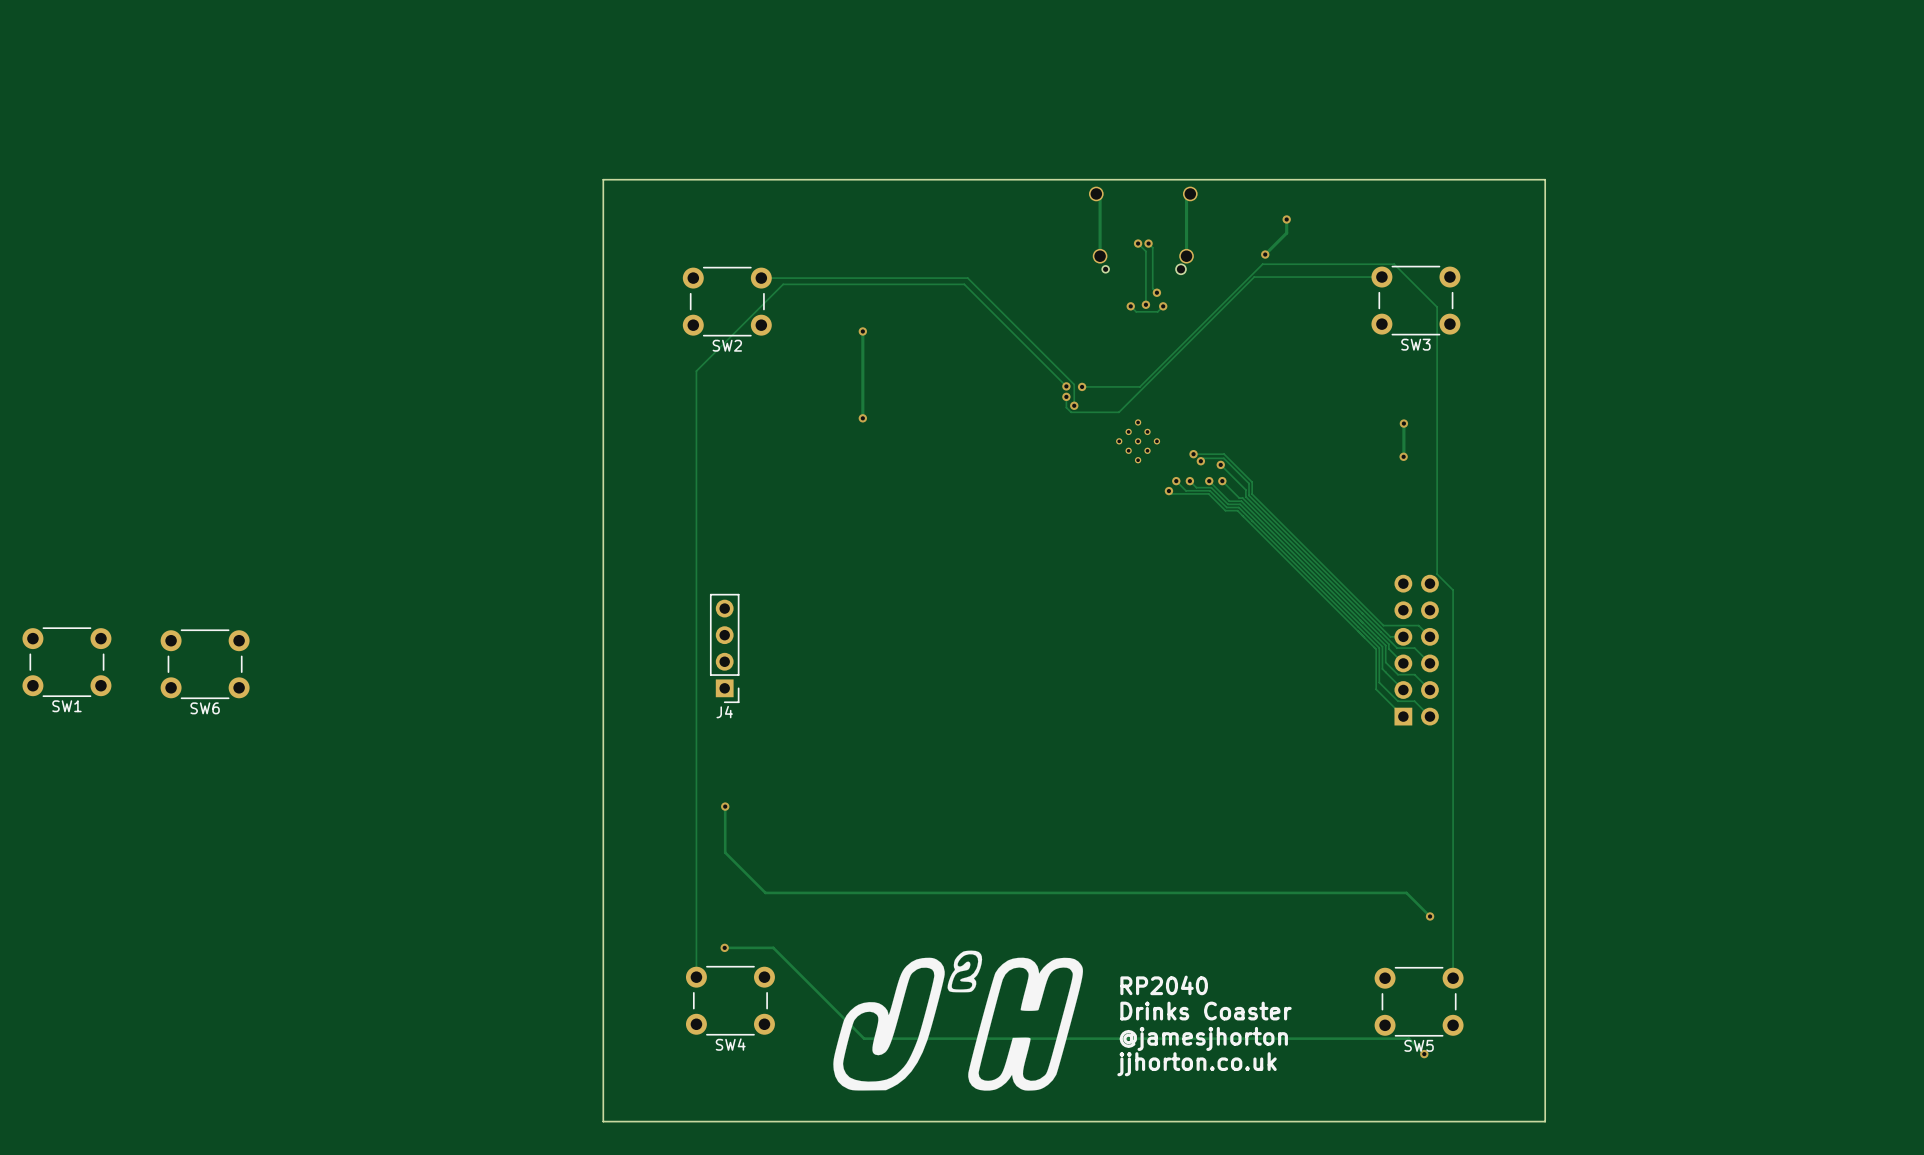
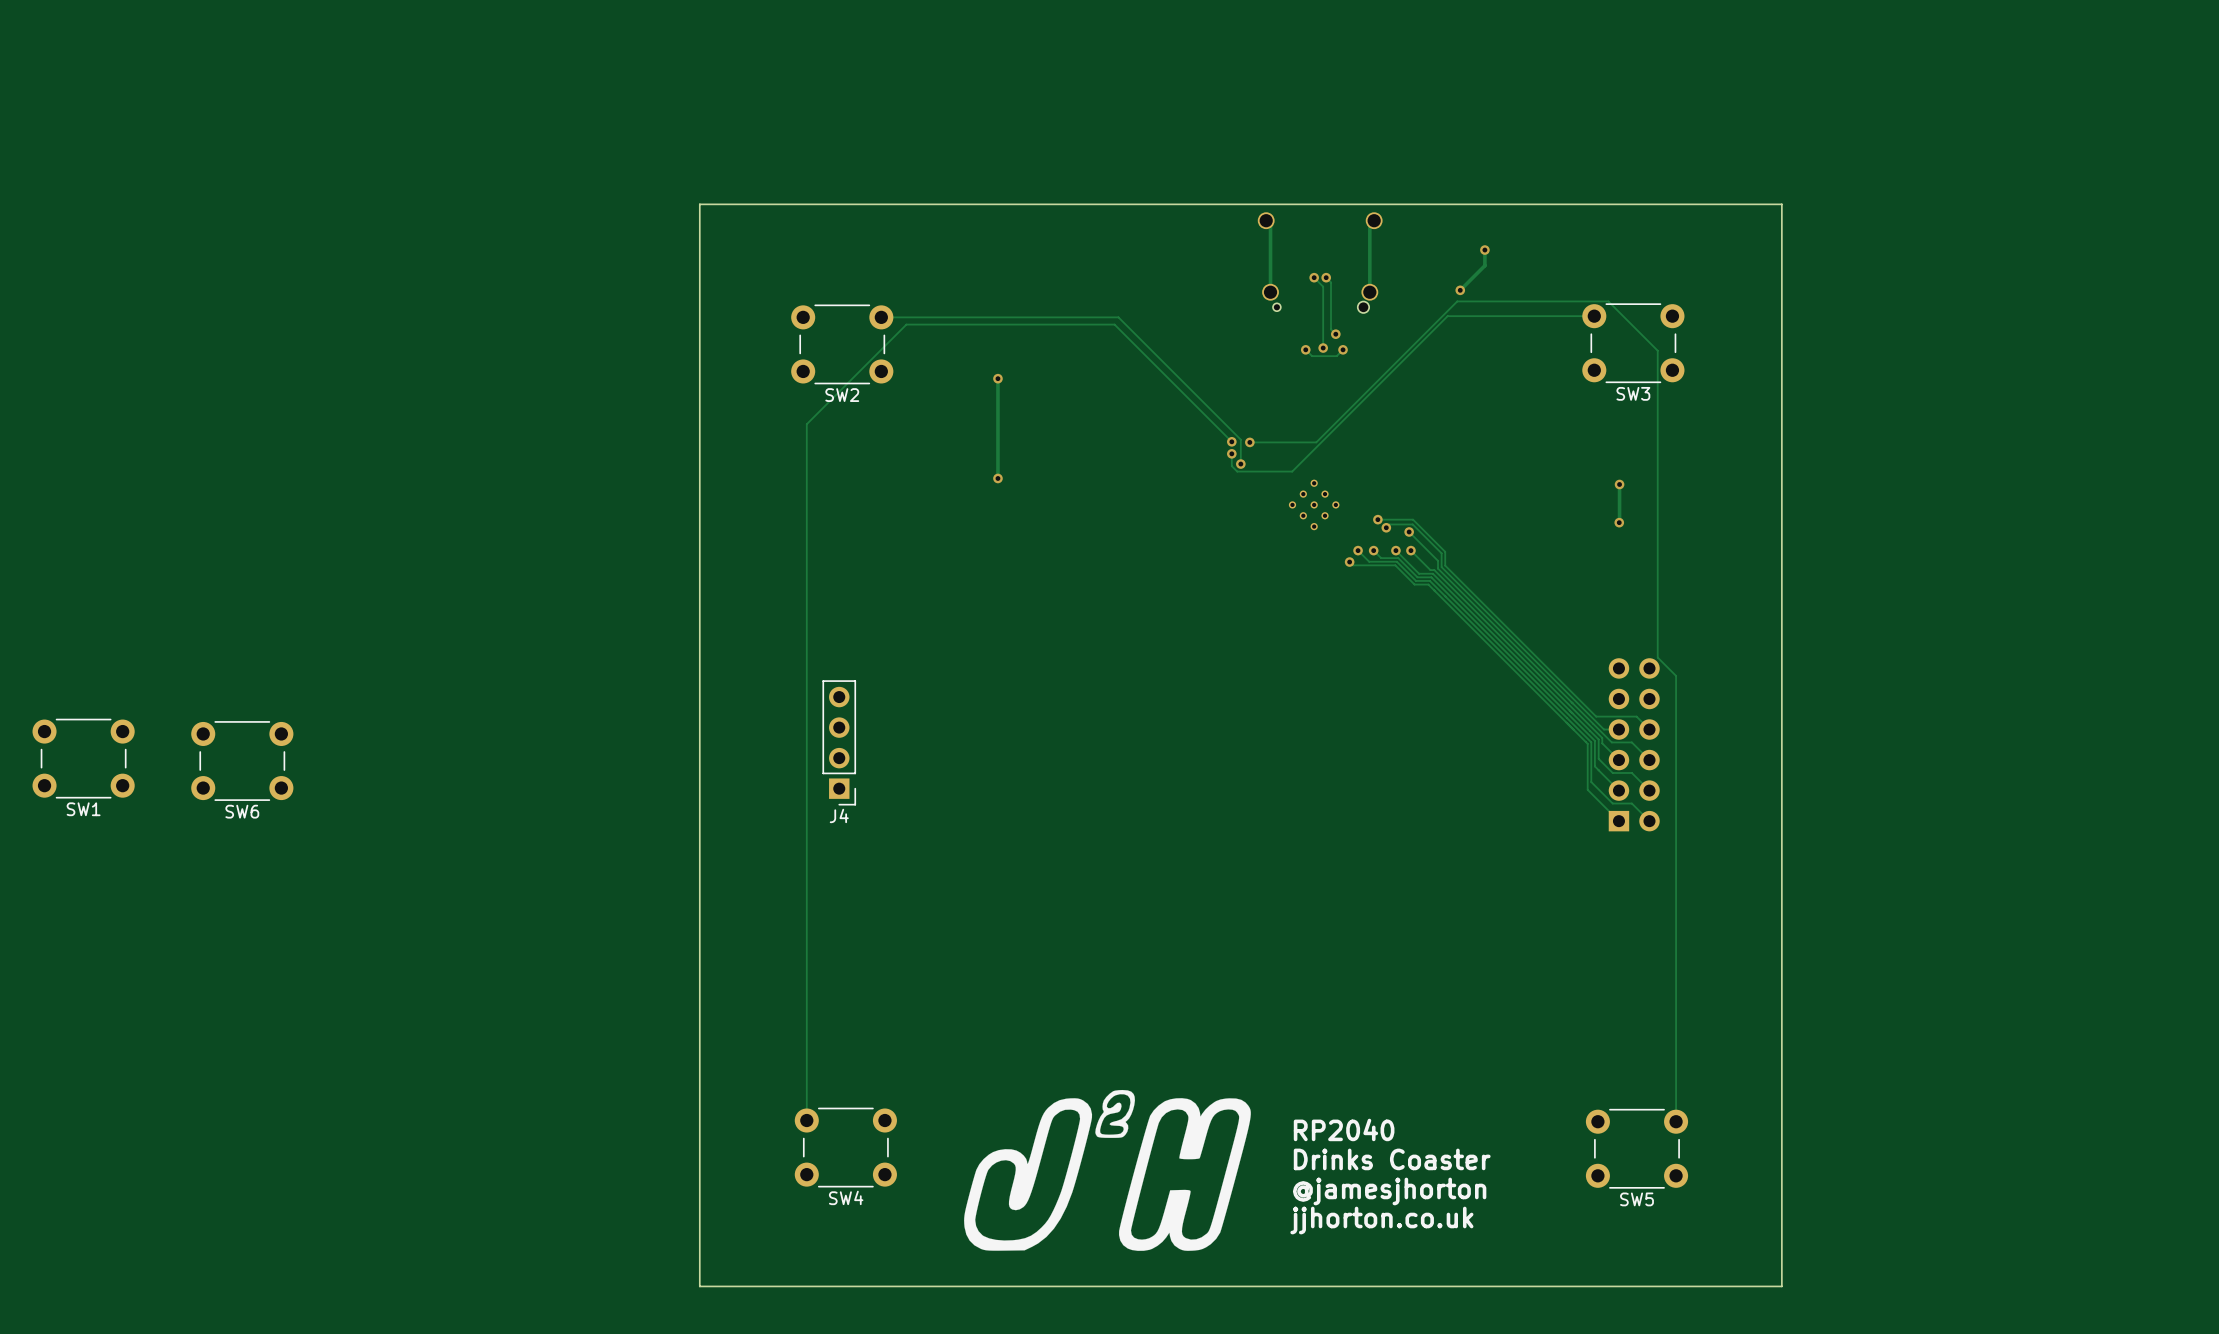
track: (725, 806) (725, 852) (765, 892) (1406, 892) (1430, 916) -> none
via: (725, 806) -> none
via: (1430, 916) -> none
track: (724, 947) (773, 947) (864, 1038) (1408, 1038) (1424, 1054) -> none
via: (724, 947) -> none
via: (1424, 1054) -> none

